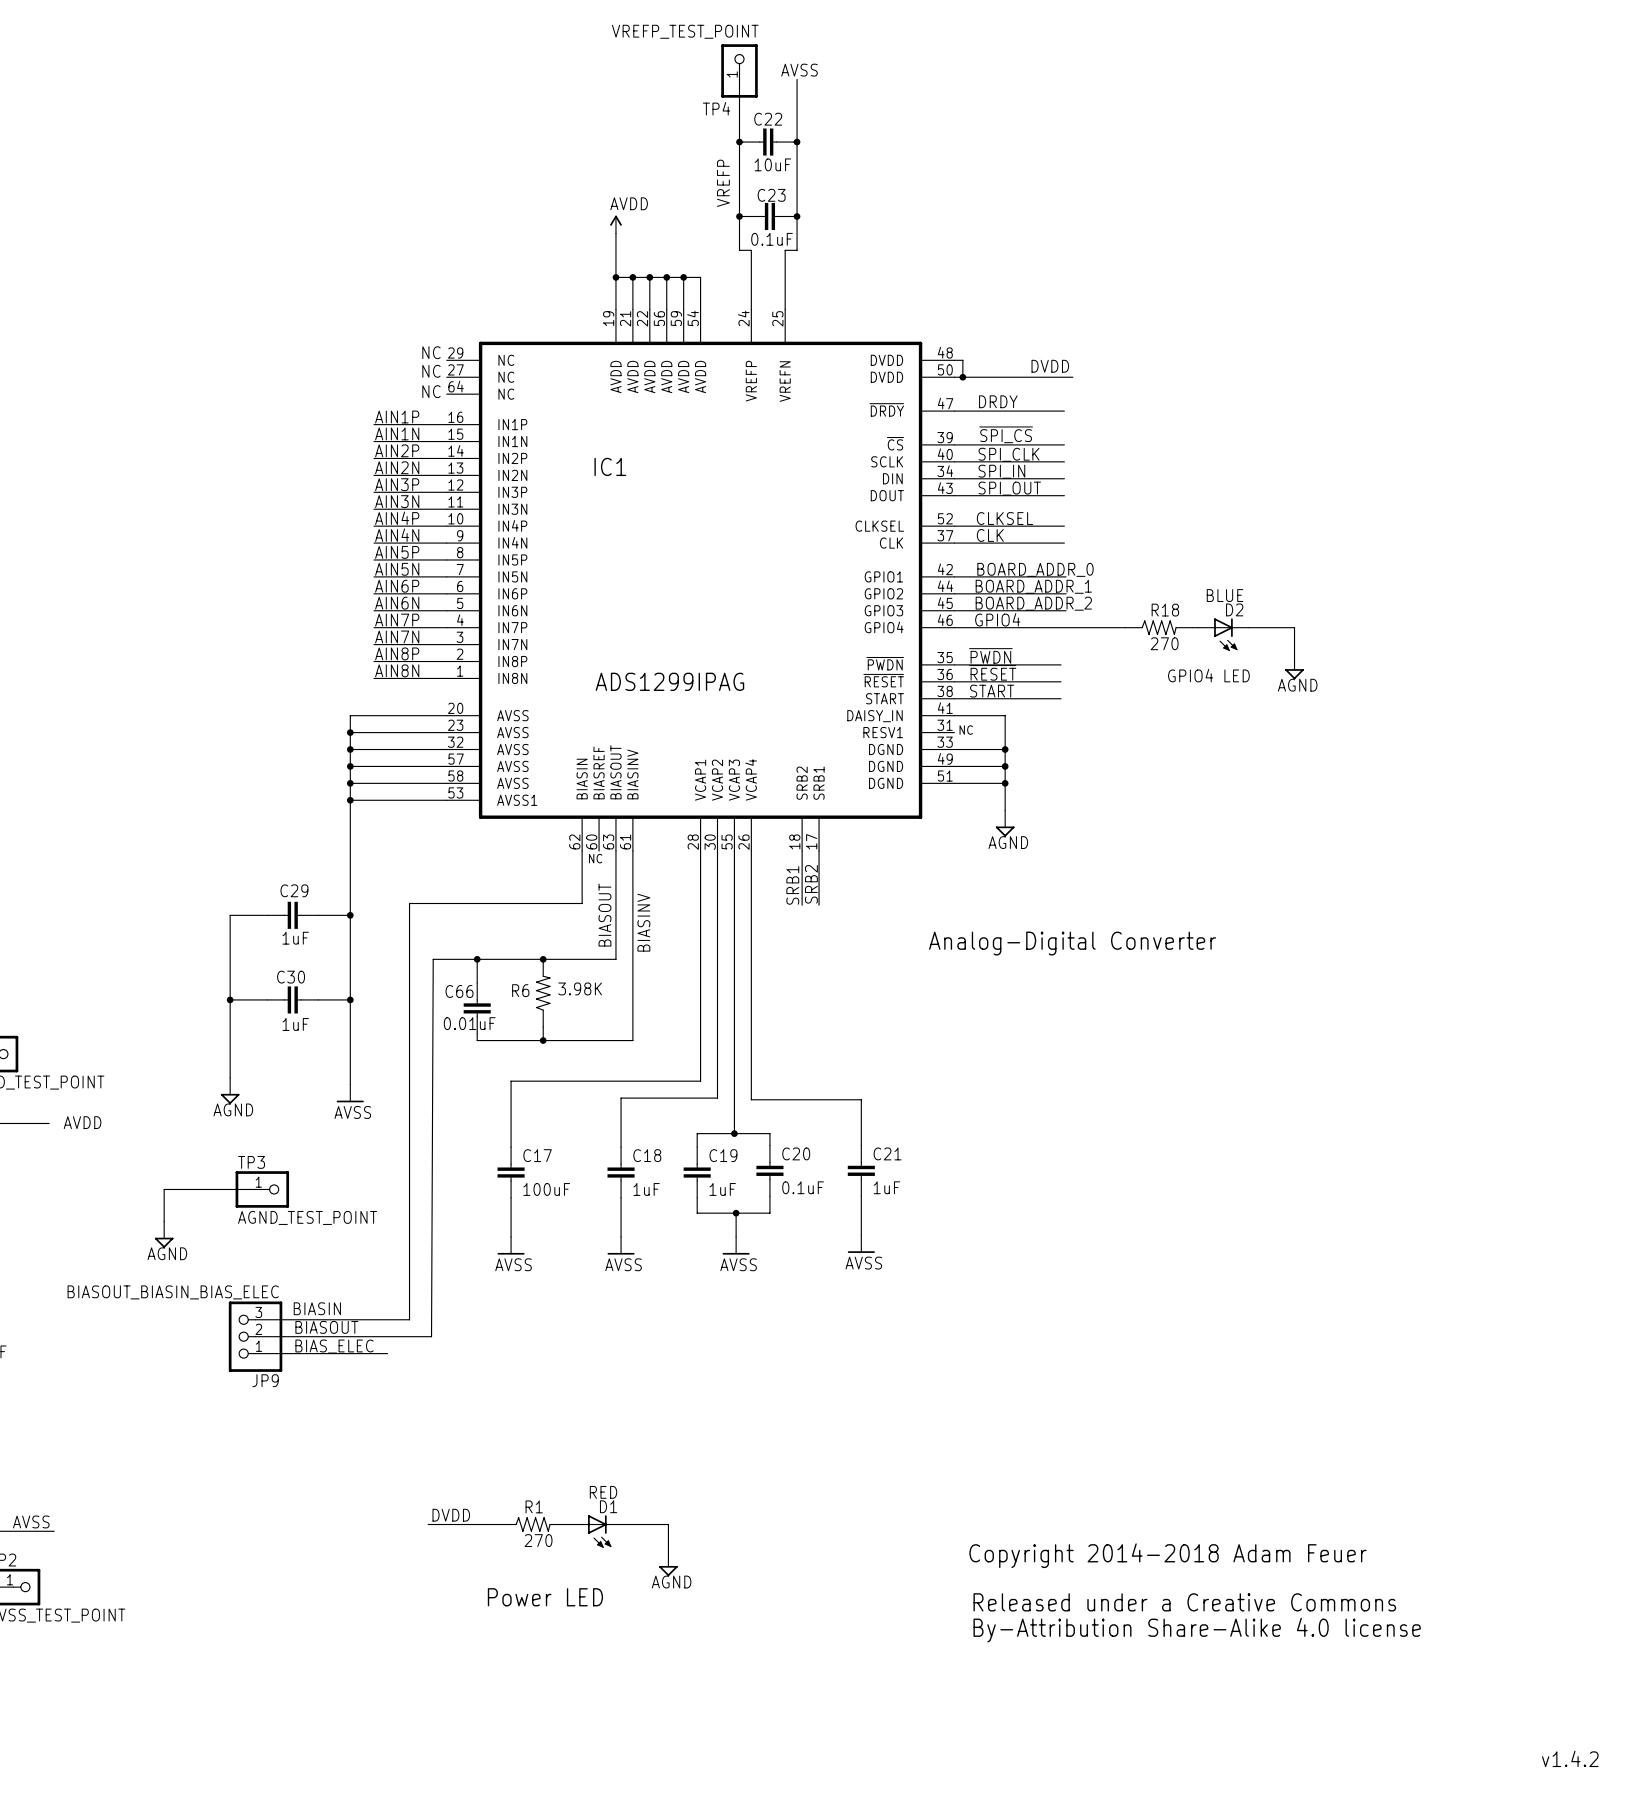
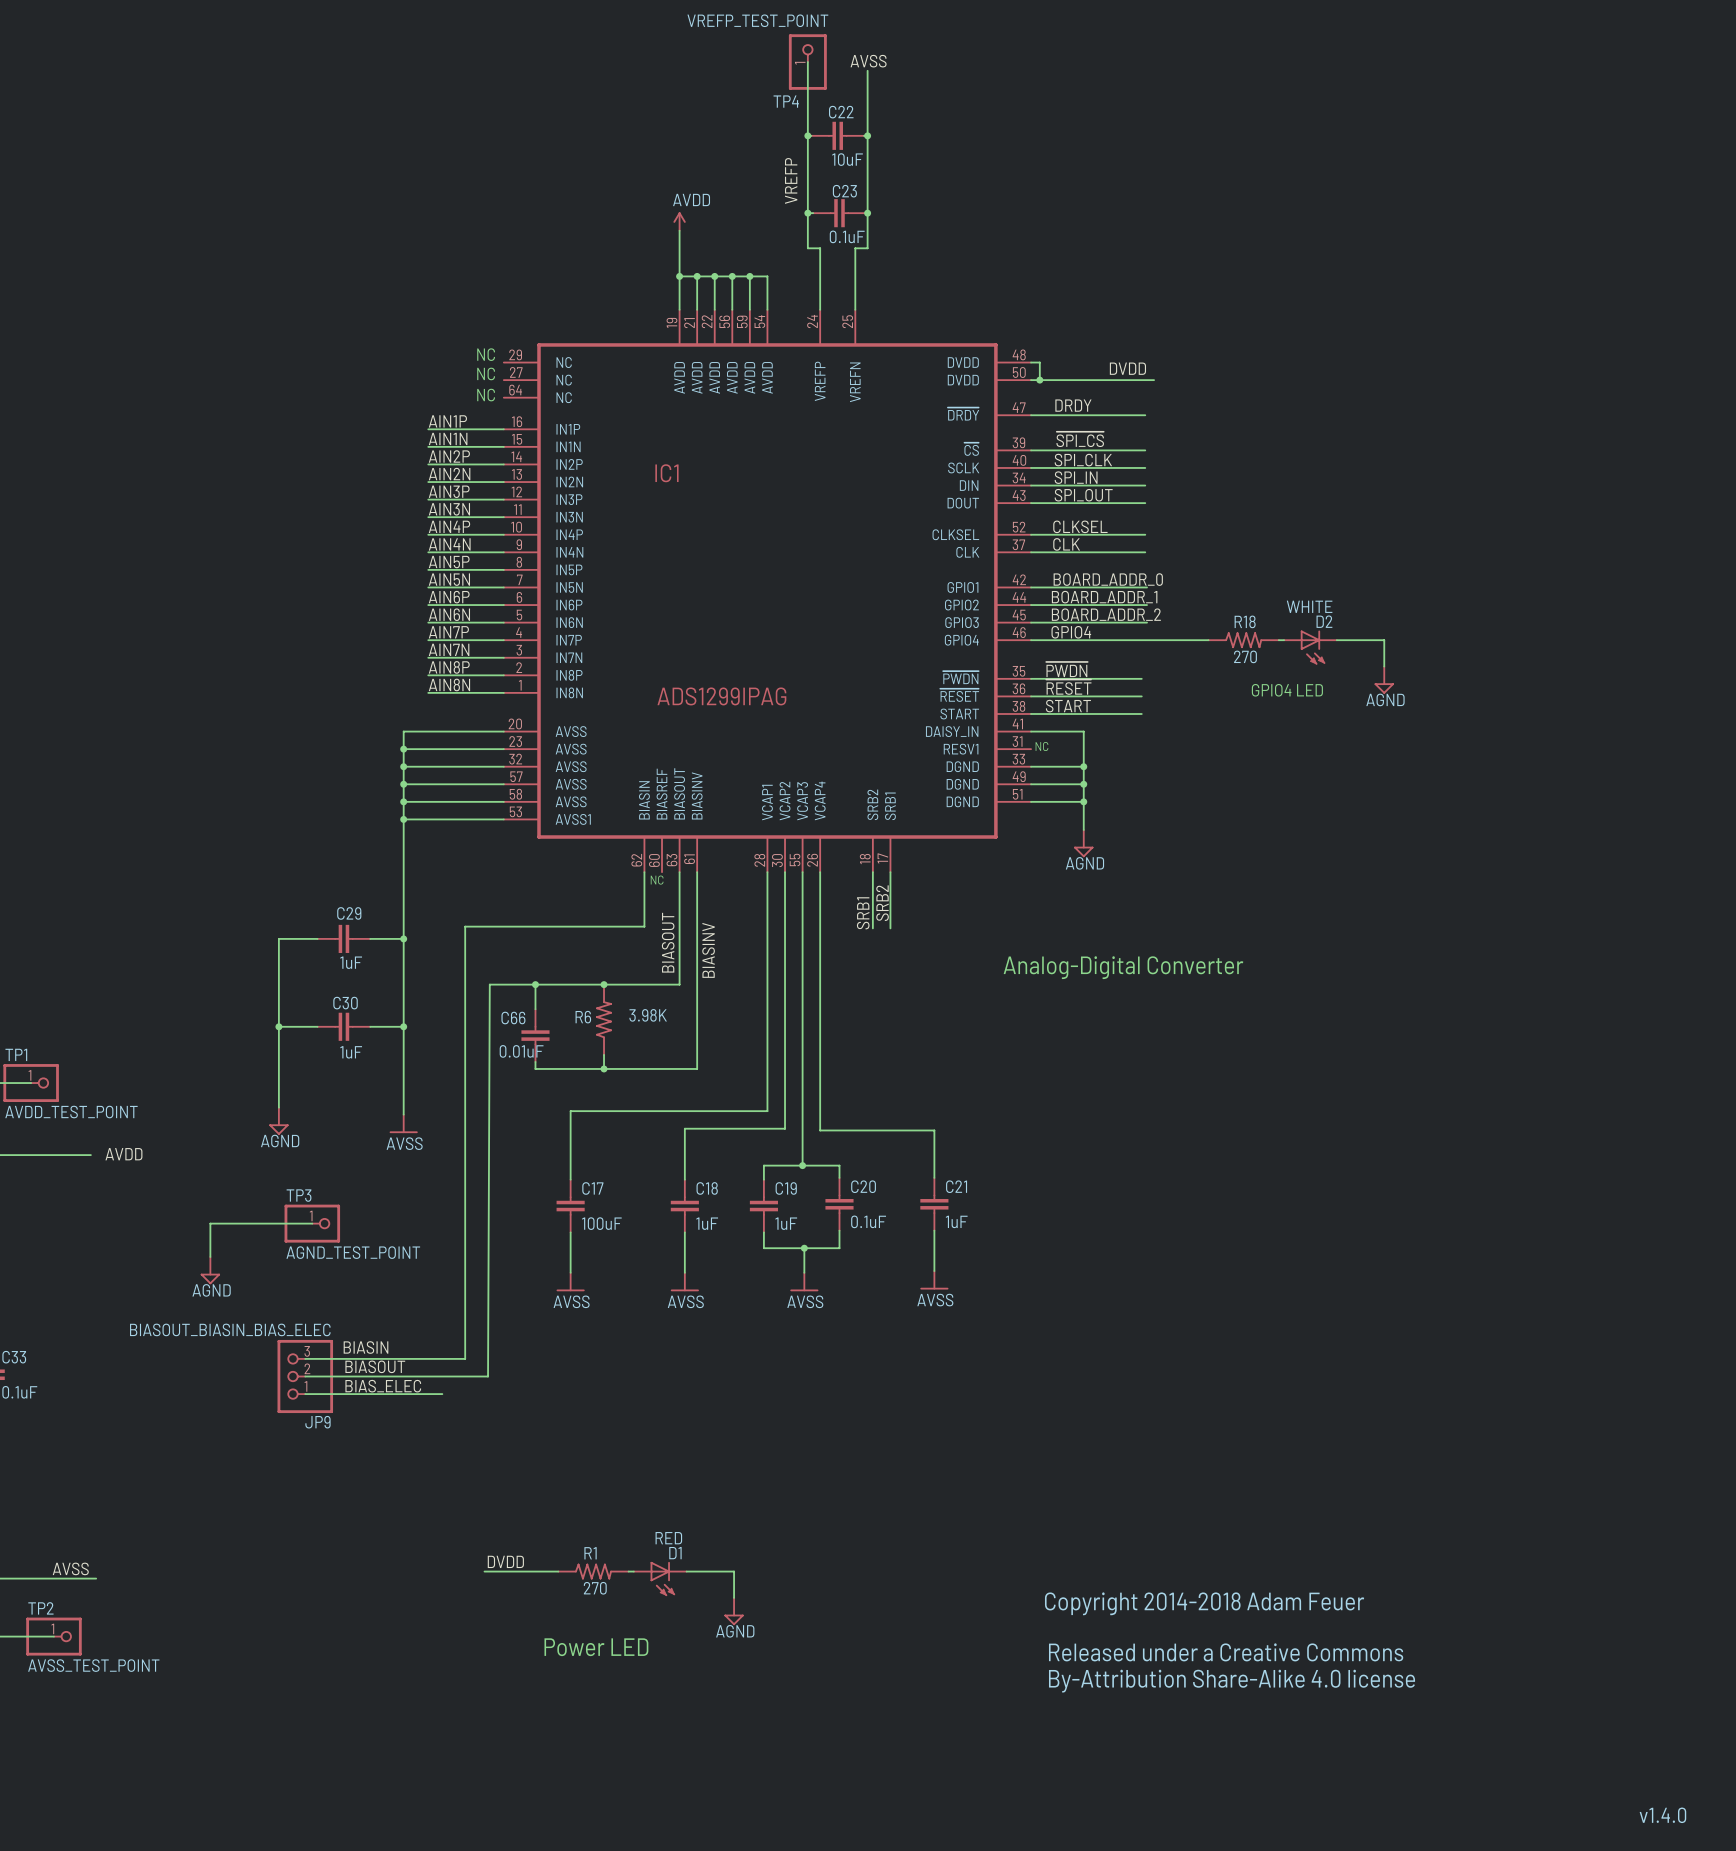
D2 value: BLUE (1225, 595) -> WHITE (1309, 606)
text: v1.4.2 (1570, 1758) -> v1.4.0 (1662, 1815)

